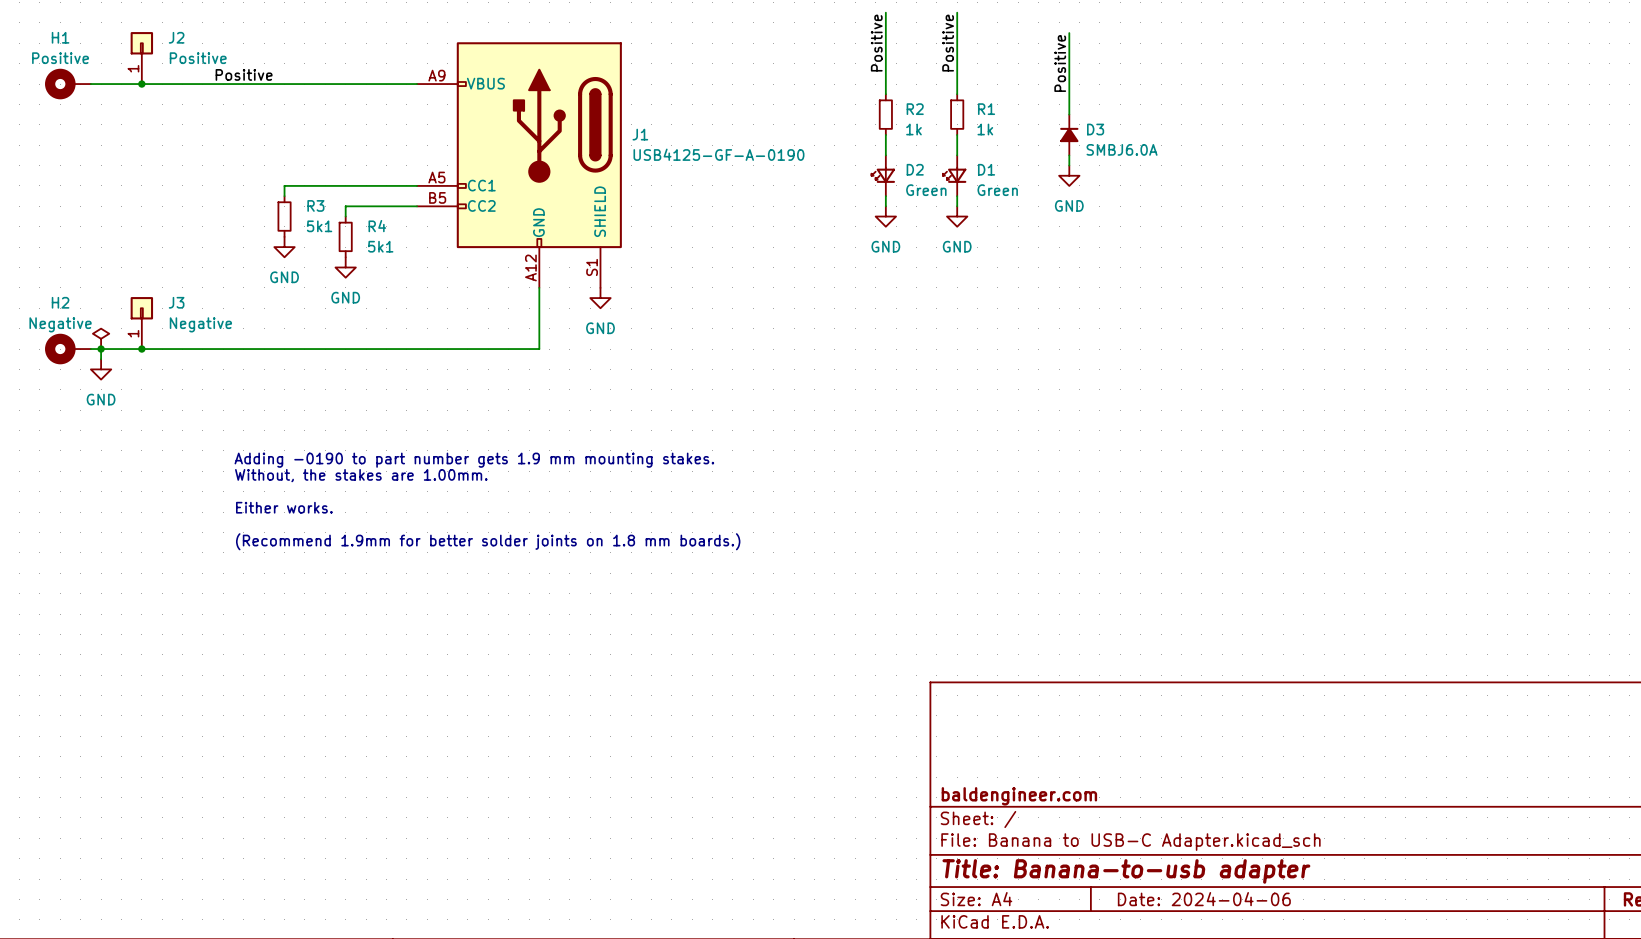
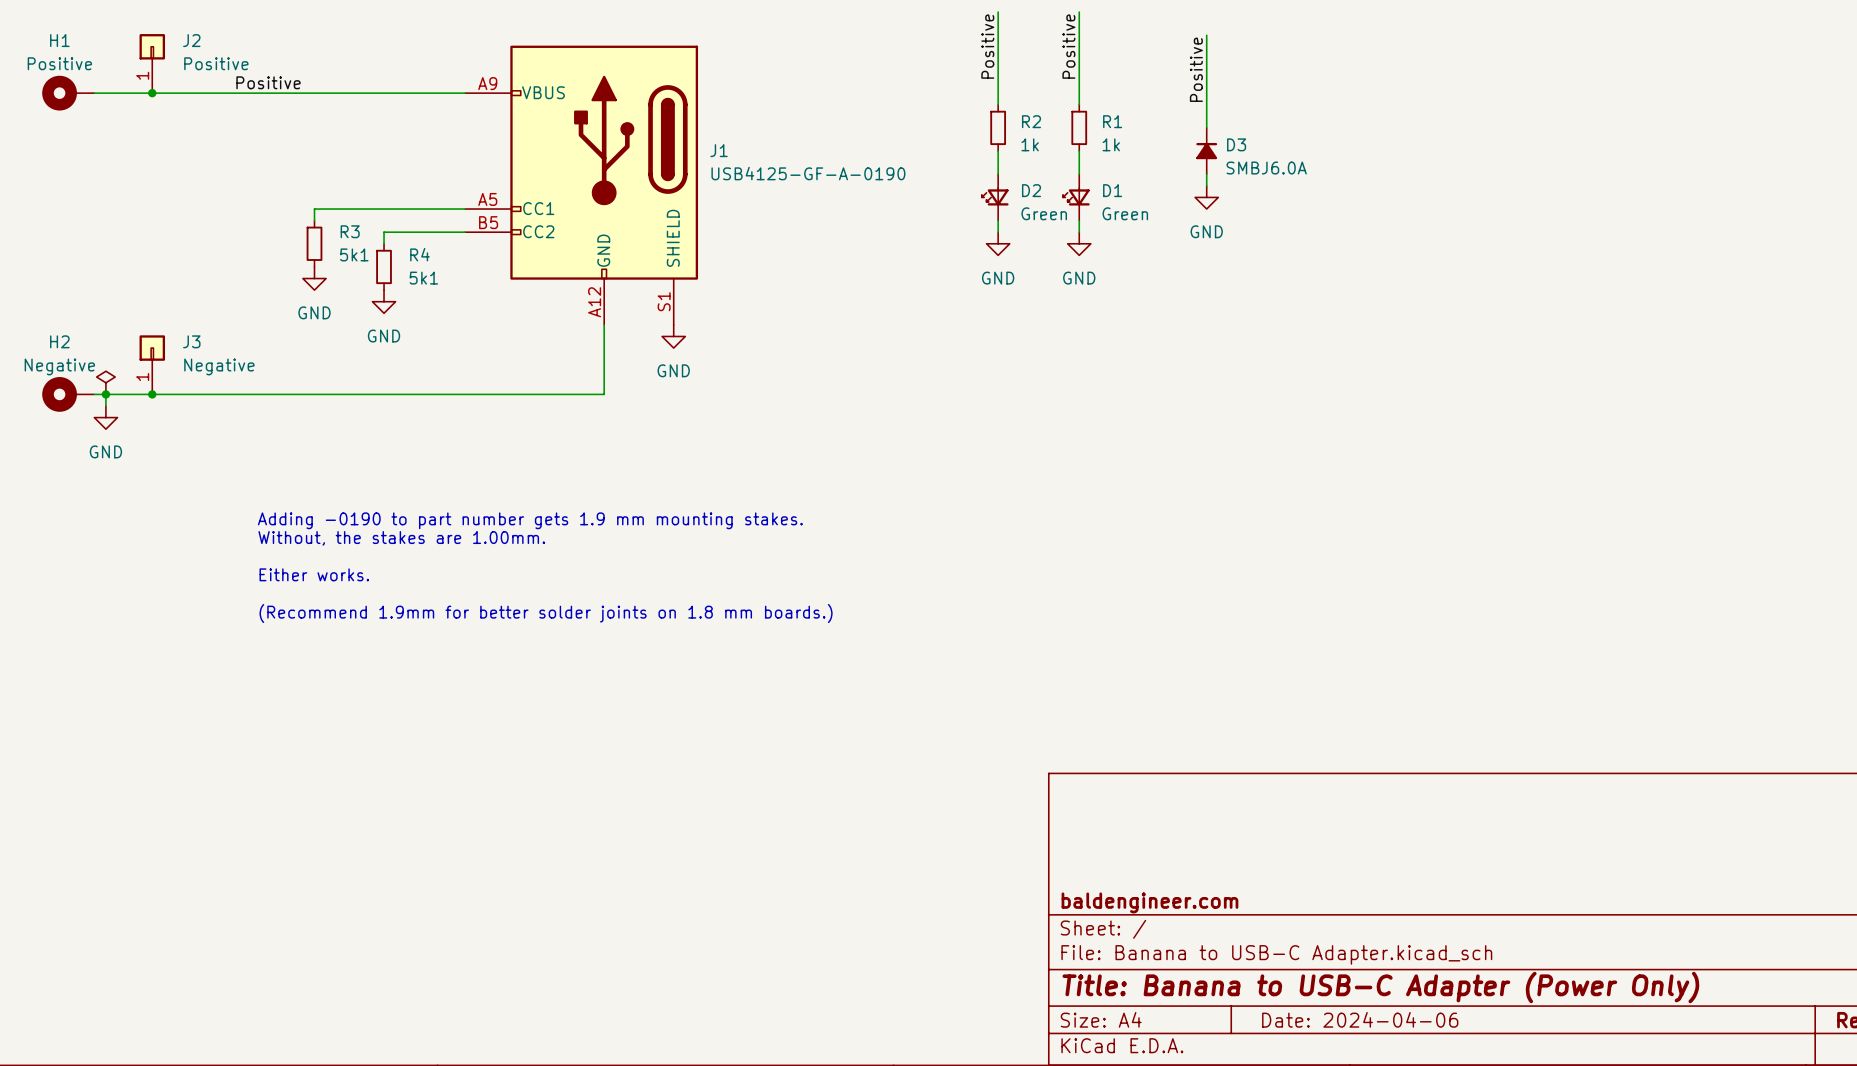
title block: Title: Banana-to-usb adapter (1126, 871) -> Title: Banana to USB-C Adapter (Power Only) (1380, 987)

